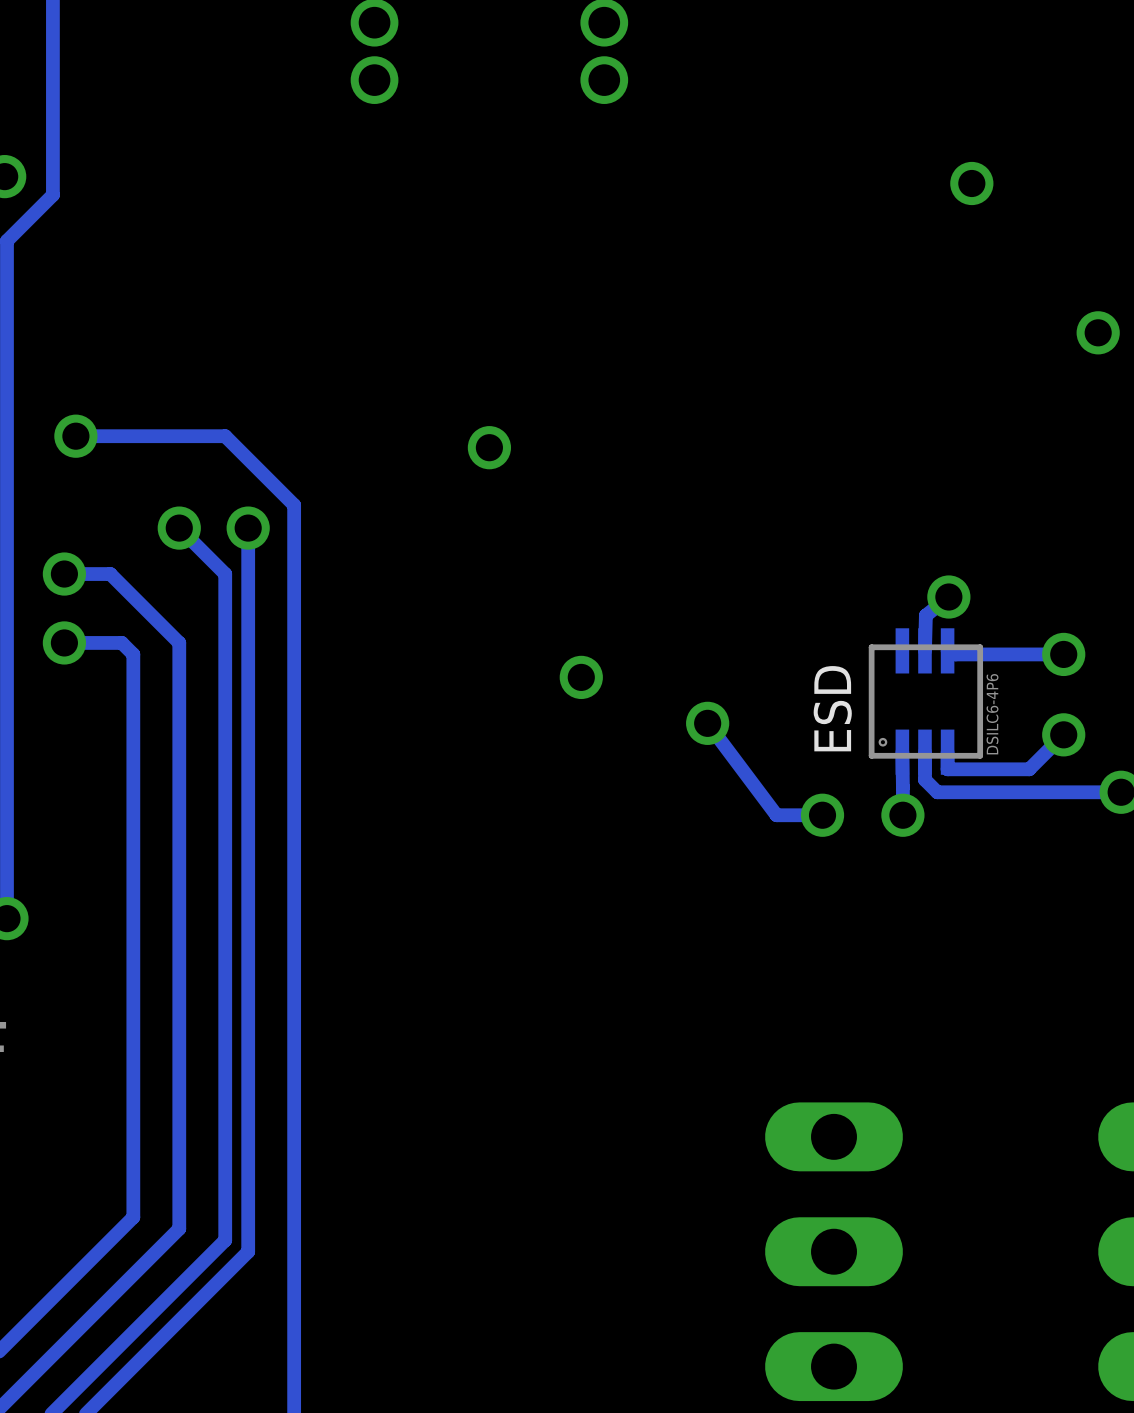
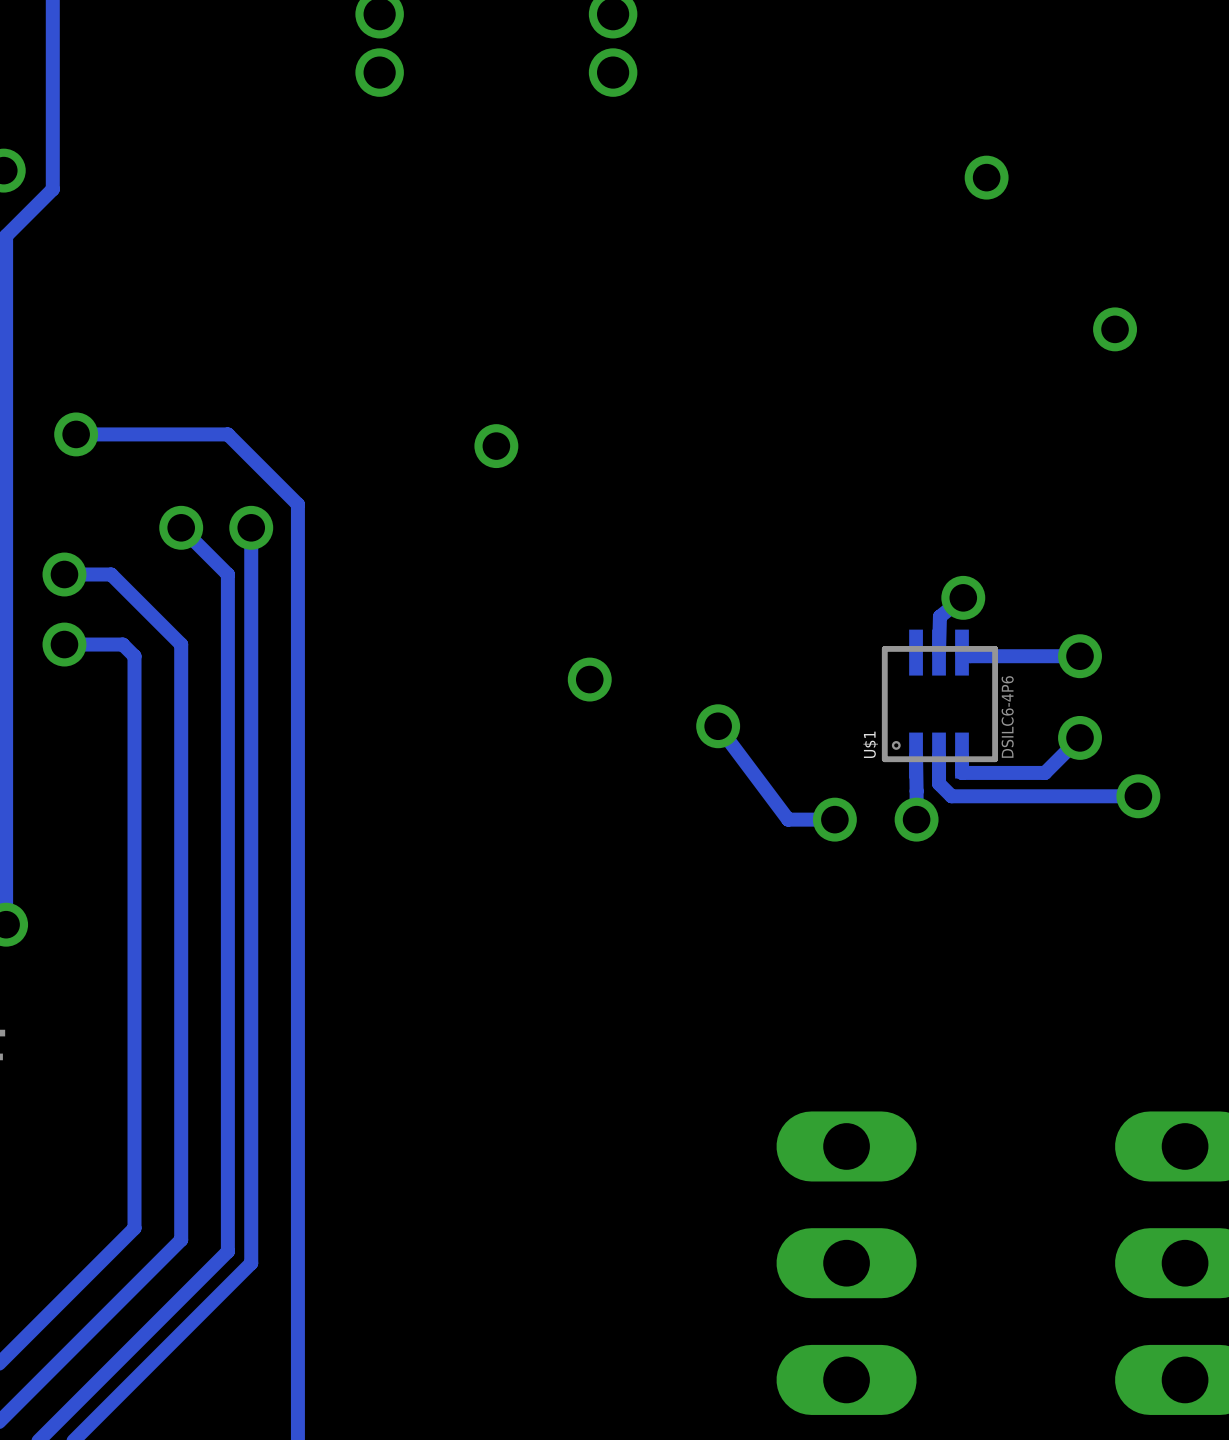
ESD name: ESD (832, 708) -> U$1 (870, 744)

